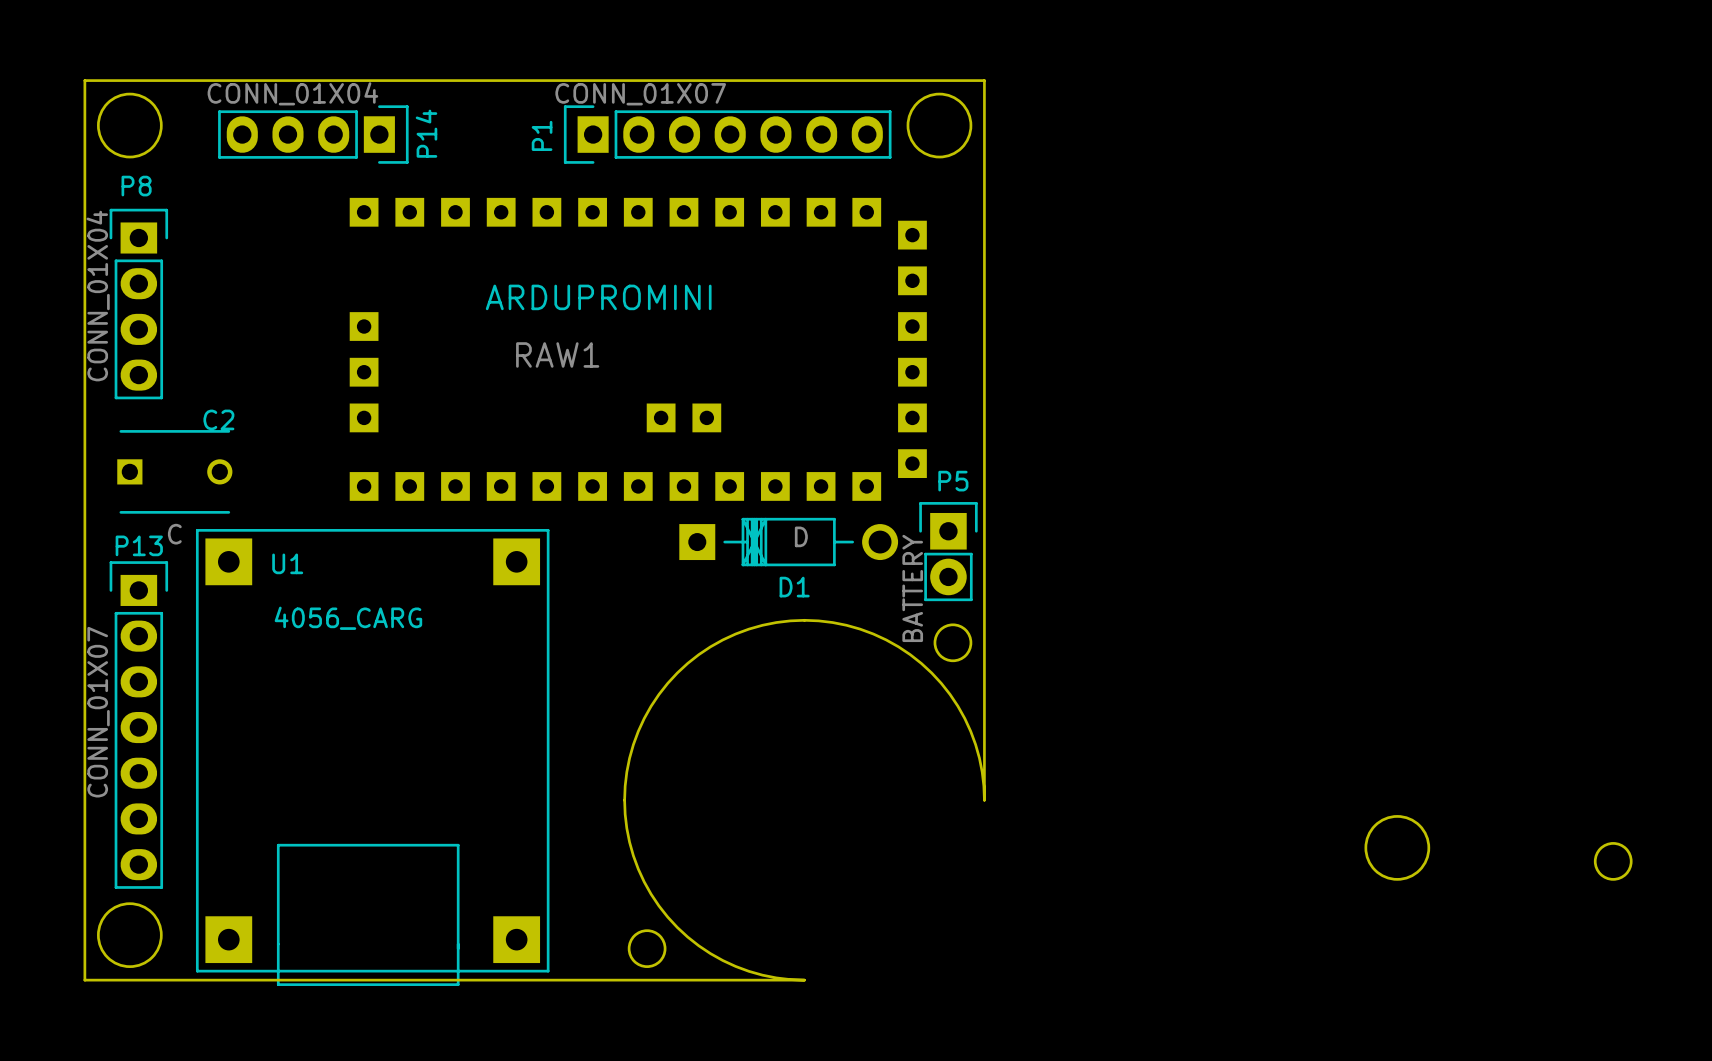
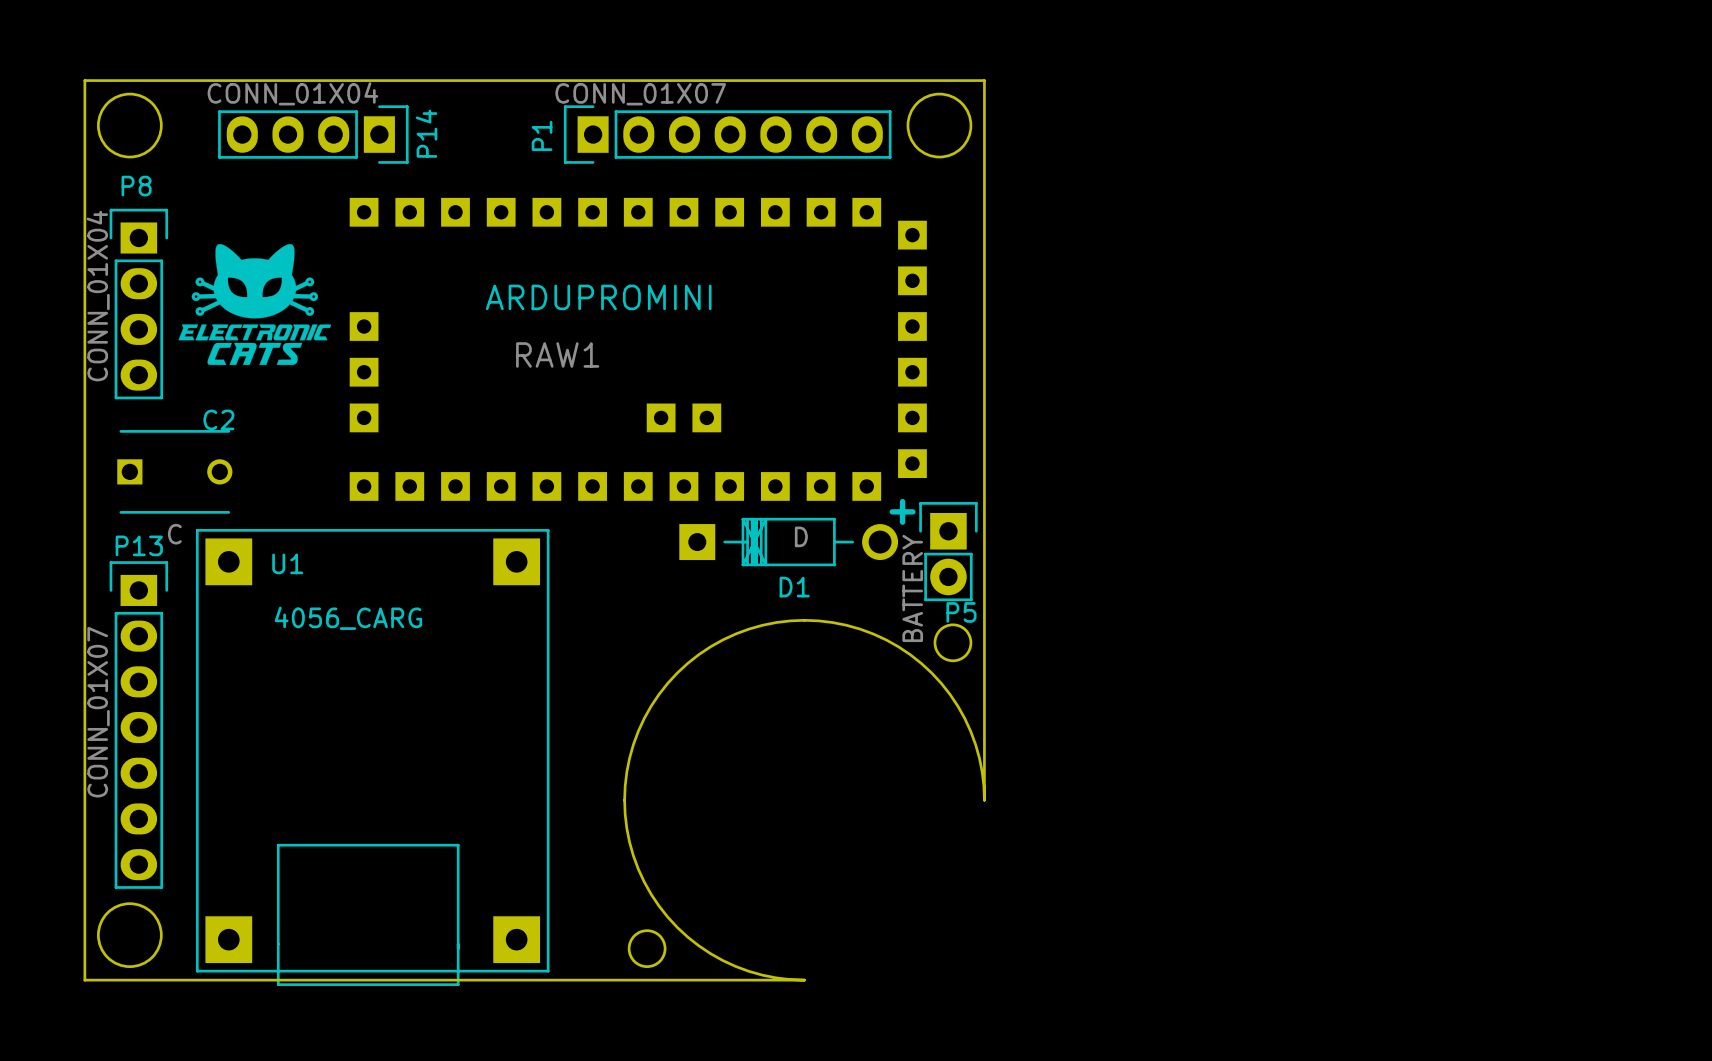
drawing: none -> [178, 244, 332, 365]
P5 name position: P5 (953, 481) -> P5 (961, 612)
text: none -> + (902, 511)
round board edge: [1364, 815, 1431, 881] -> none
round board edge: [1593, 842, 1633, 881] -> none

